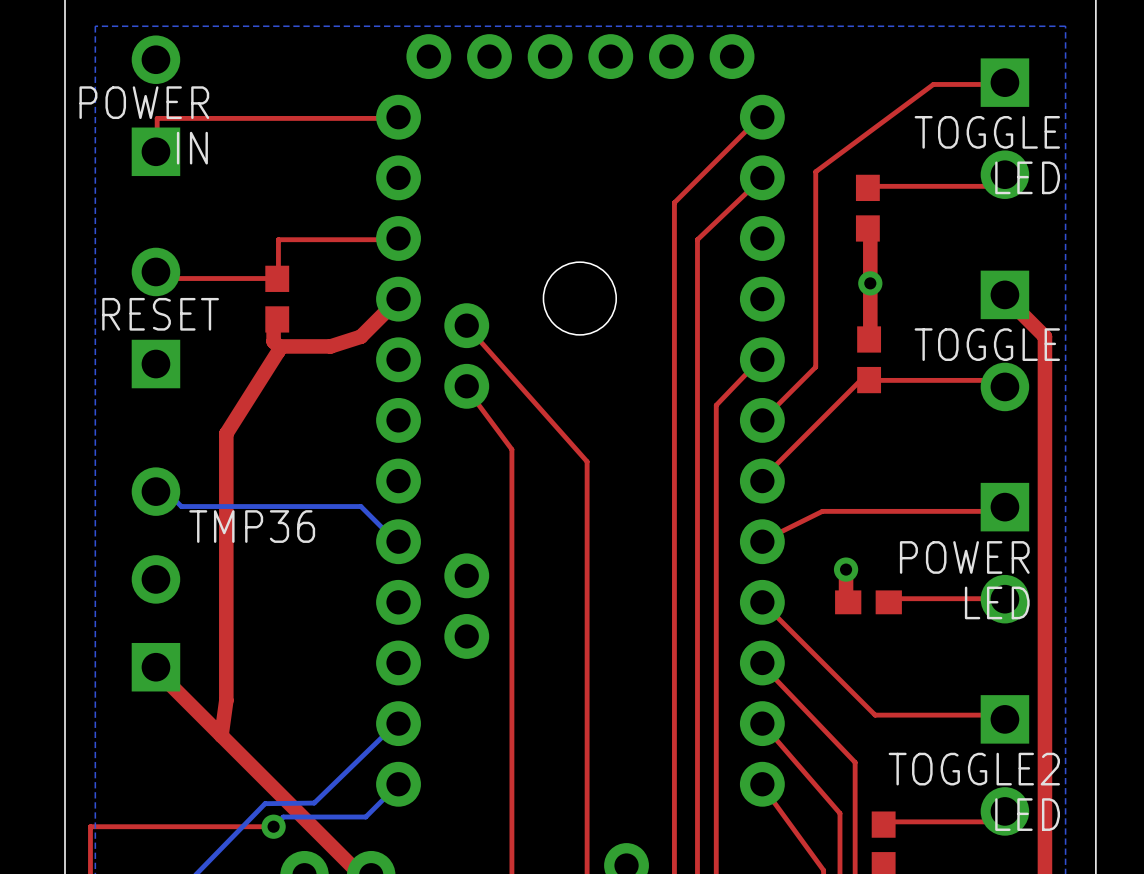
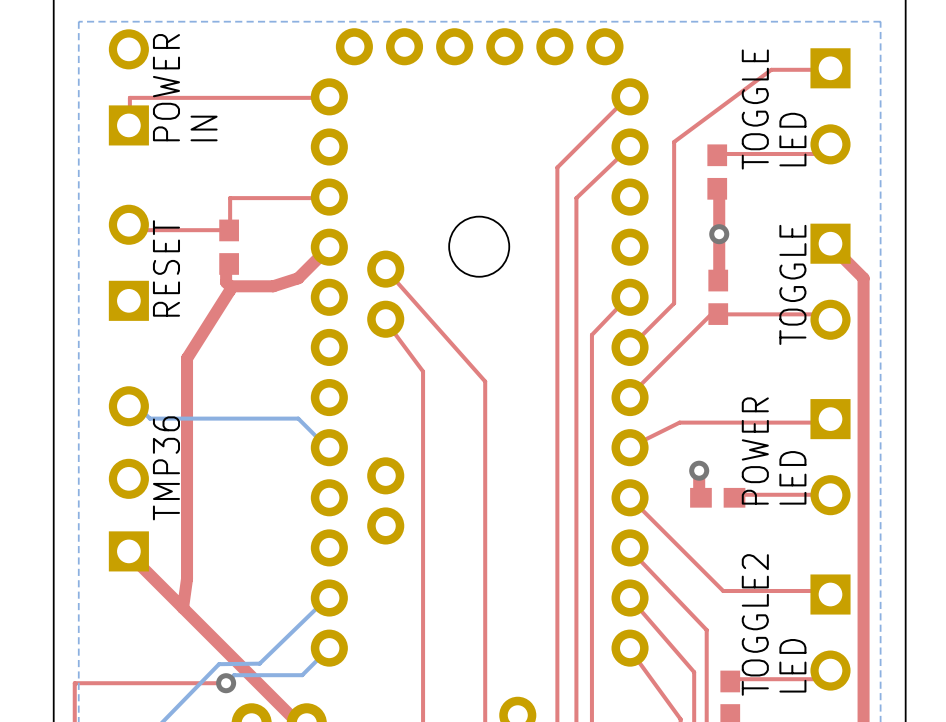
text rotation: 0° (144, 102) -> 90° counterclockwise (166, 87)
text rotation: 0° (987, 132) -> 90° counterclockwise (755, 109)
text rotation: 0° (192, 148) -> 90° counterclockwise (204, 128)
text position: IN (192, 148) -> IN (204, 128)
text rotation: 0° (1027, 177) -> 90° counterclockwise (792, 139)
text rotation: 0° (160, 314) -> 90° counterclockwise (166, 268)
text rotation: 0° (987, 344) -> 90° counterclockwise (792, 284)
text rotation: 0° (252, 526) -> 90° counterclockwise (166, 468)
text rotation: 0° (964, 557) -> 90° counterclockwise (755, 451)
text rotation: 0° (997, 602) -> 90° counterclockwise (792, 477)
text rotation: 0° (974, 769) -> 90° counterclockwise (755, 624)
text rotation: 0° (1027, 814) -> 90° counterclockwise (792, 665)

